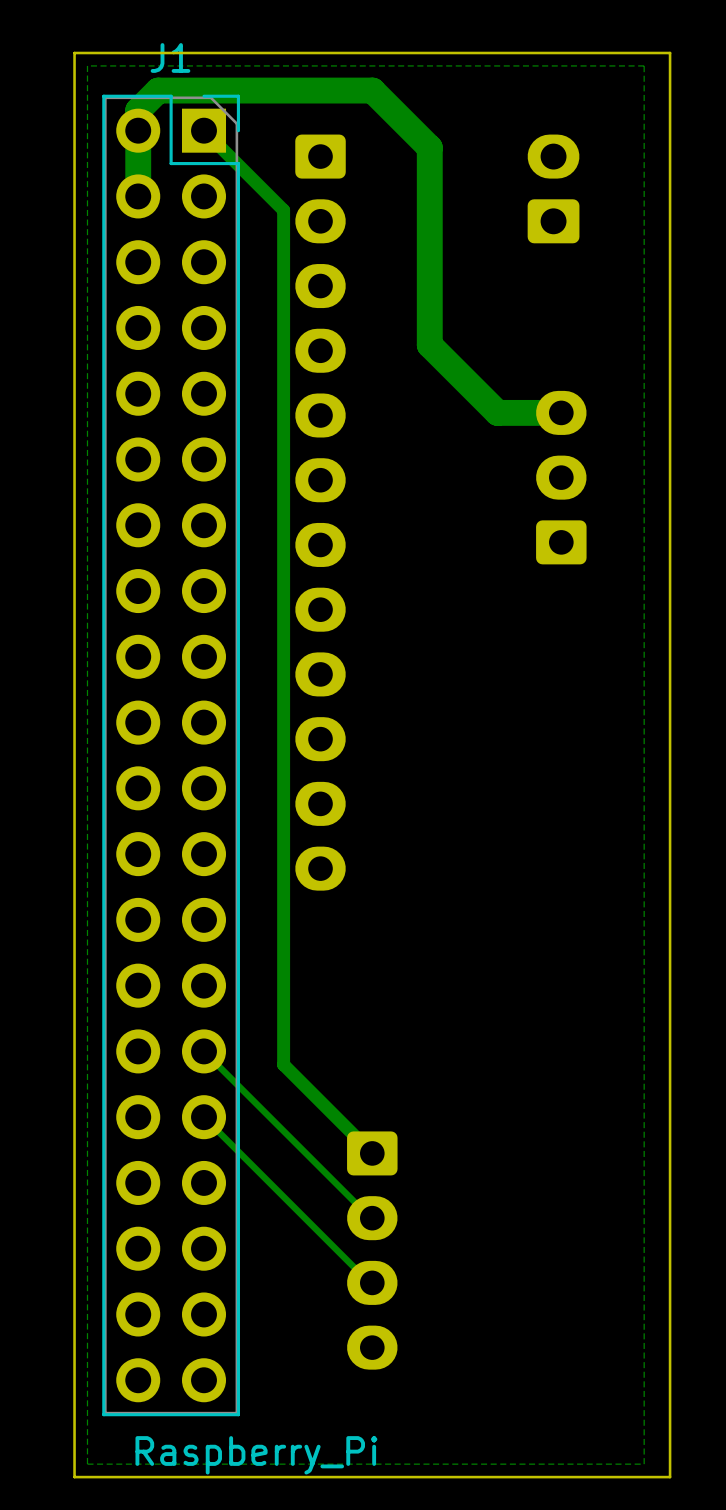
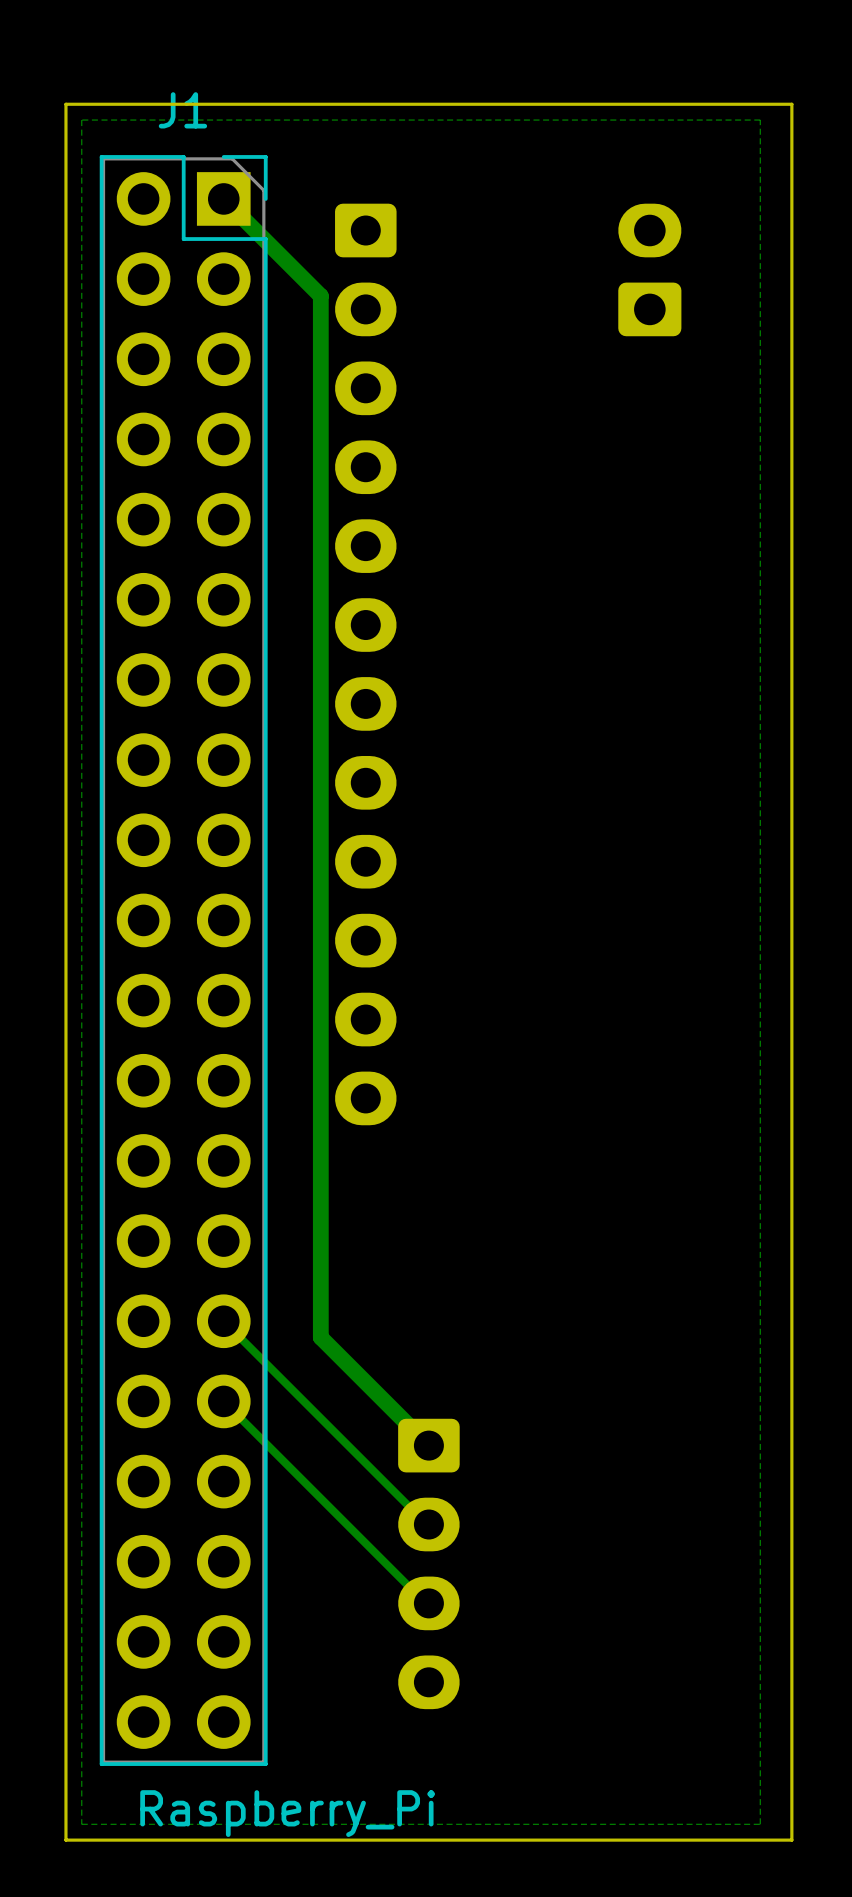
track: (138, 196) (138, 110) (158, 90) (372, 90) (429, 147) (429, 345) (497, 412) (561, 412) -> none
part: (561, 477) -> none

